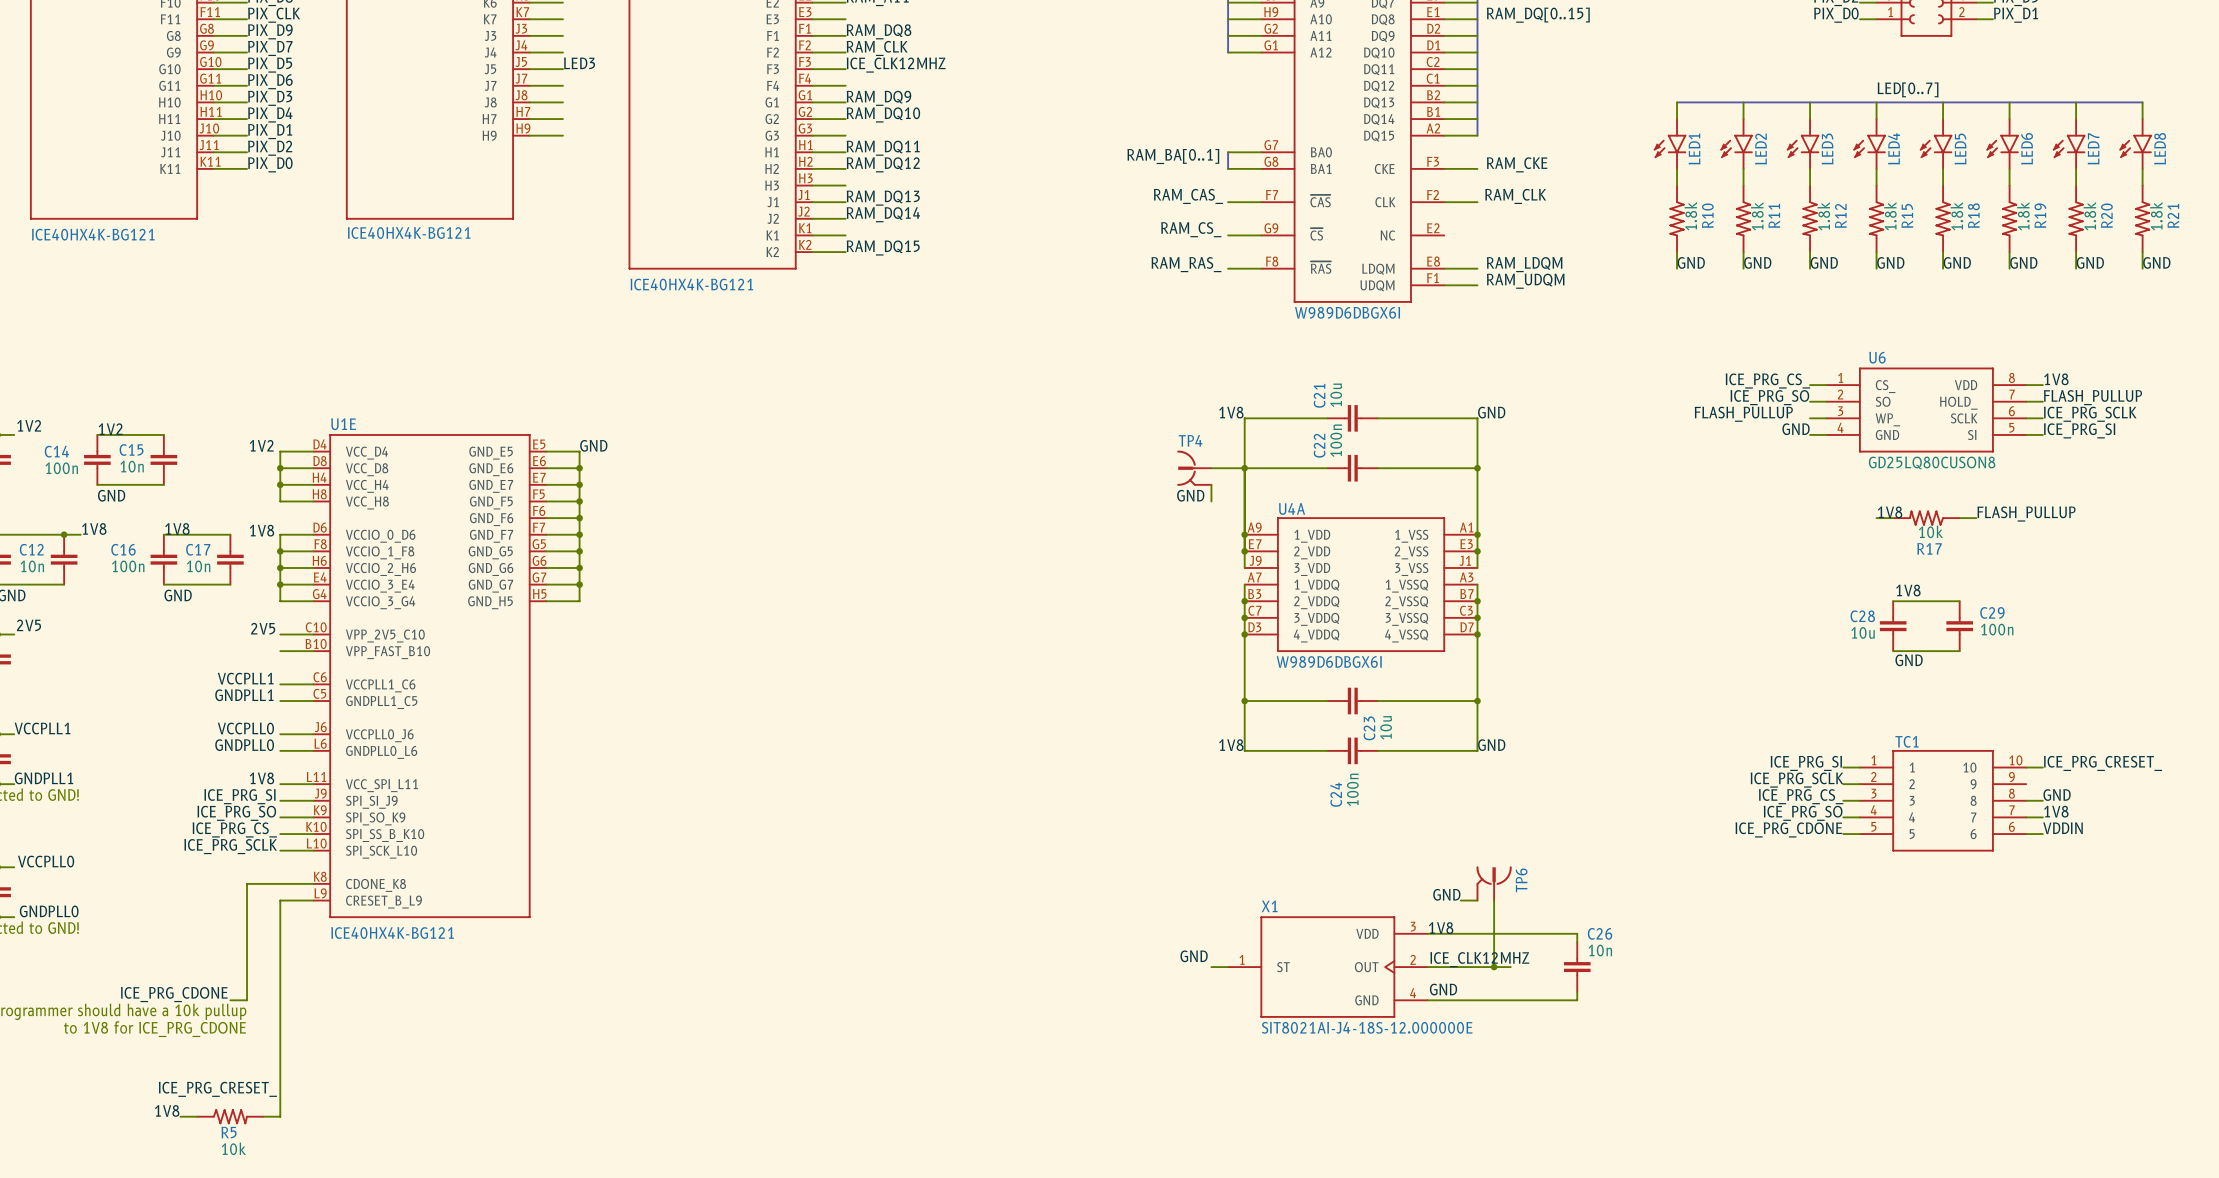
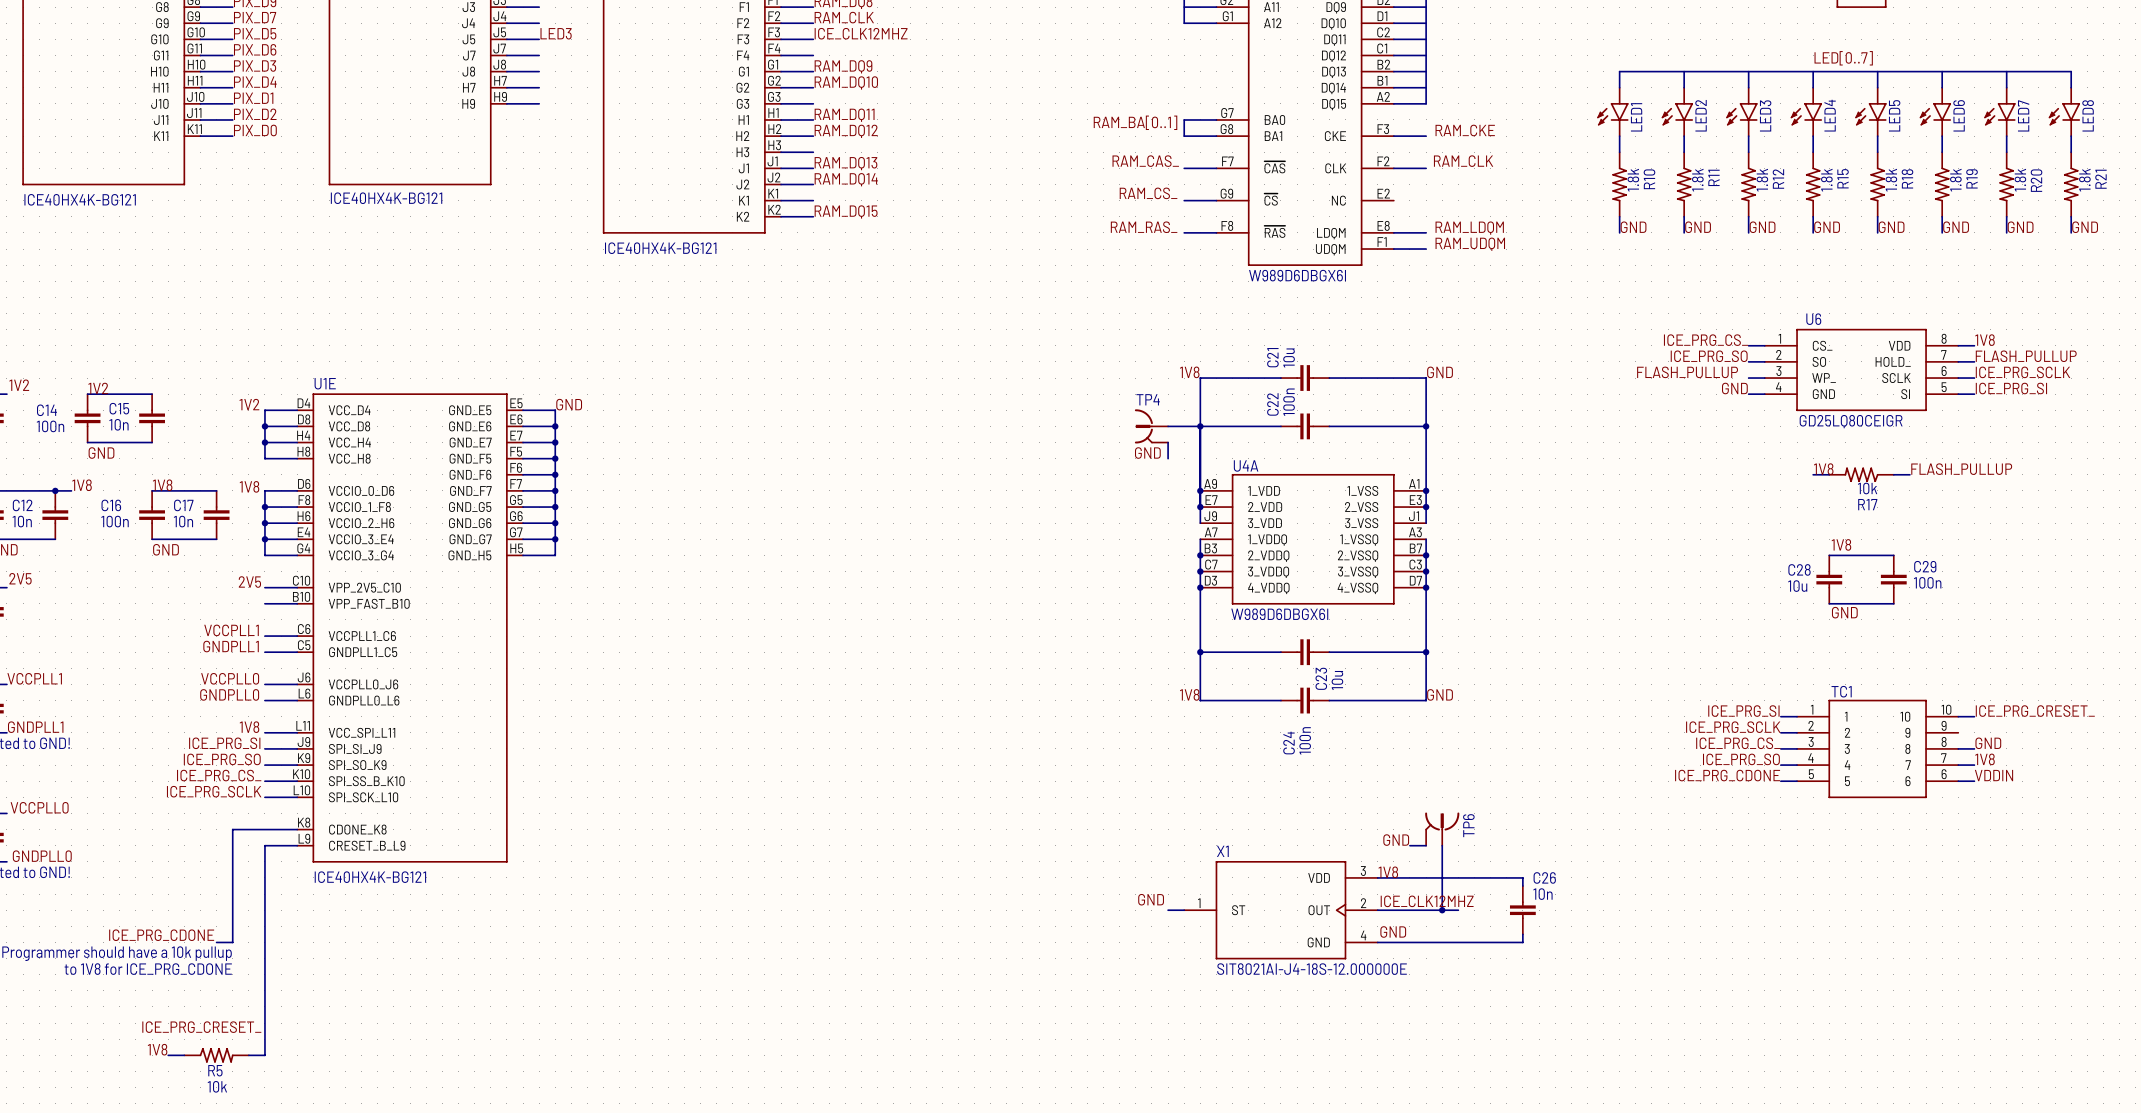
U6 text: none -> GD25LQ80CEIGR (1851, 421)
U6 value: GD25LQ80CUSON8 (1932, 462) -> none

